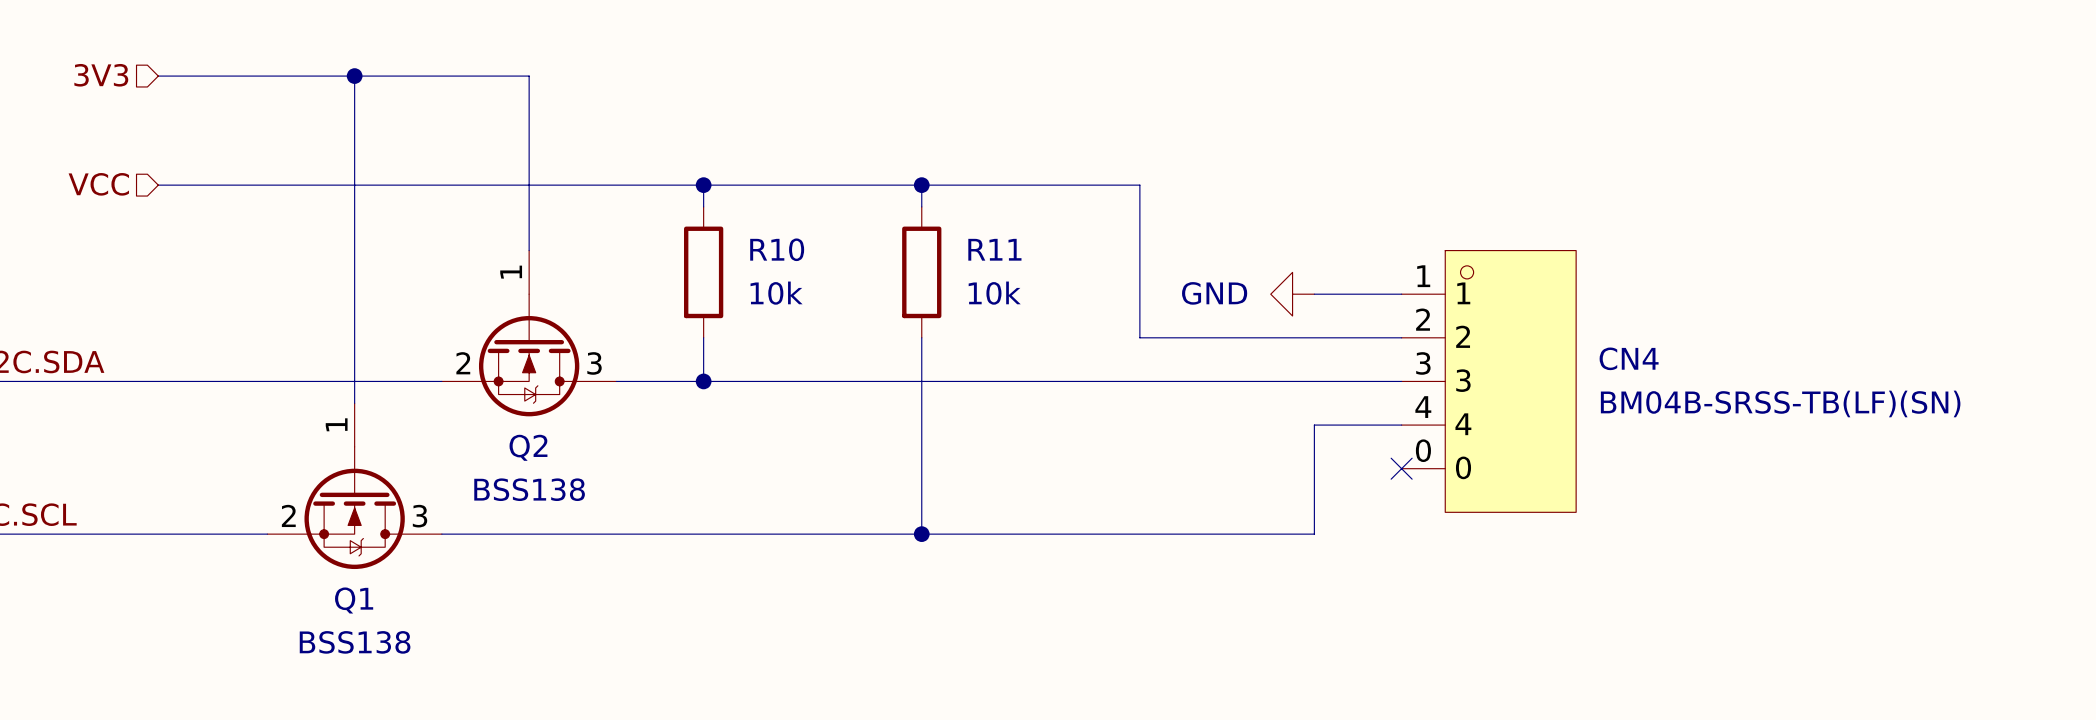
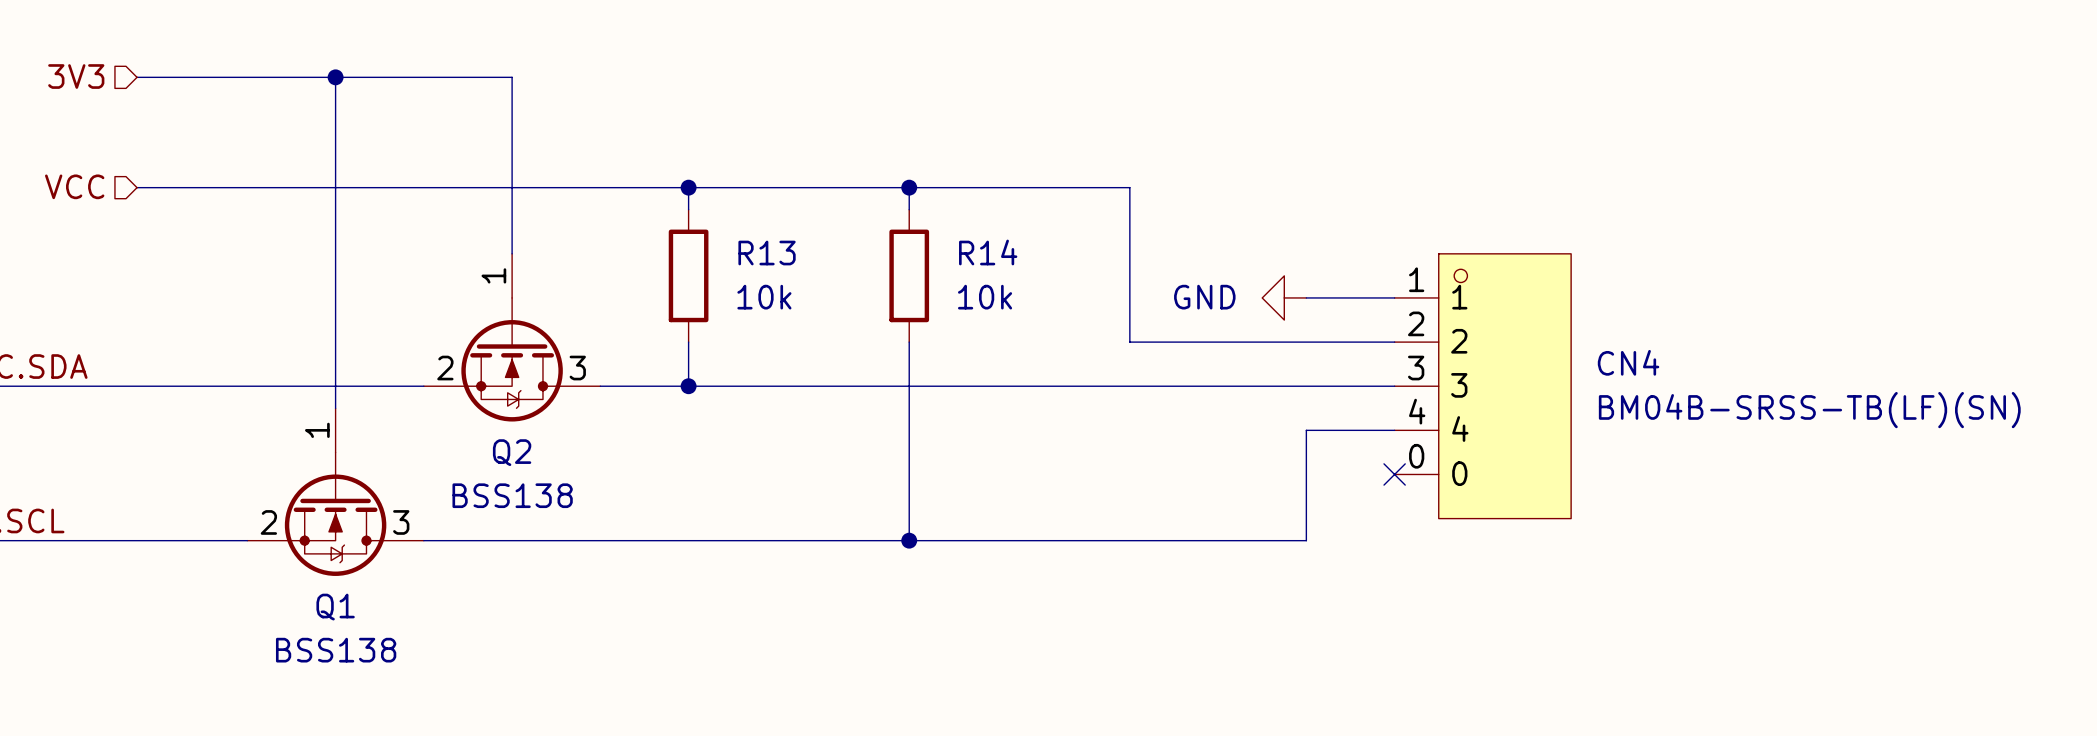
R10 name: R10 (777, 249) -> R13 (767, 253)
R11 name: R11 (994, 249) -> R14 (988, 252)

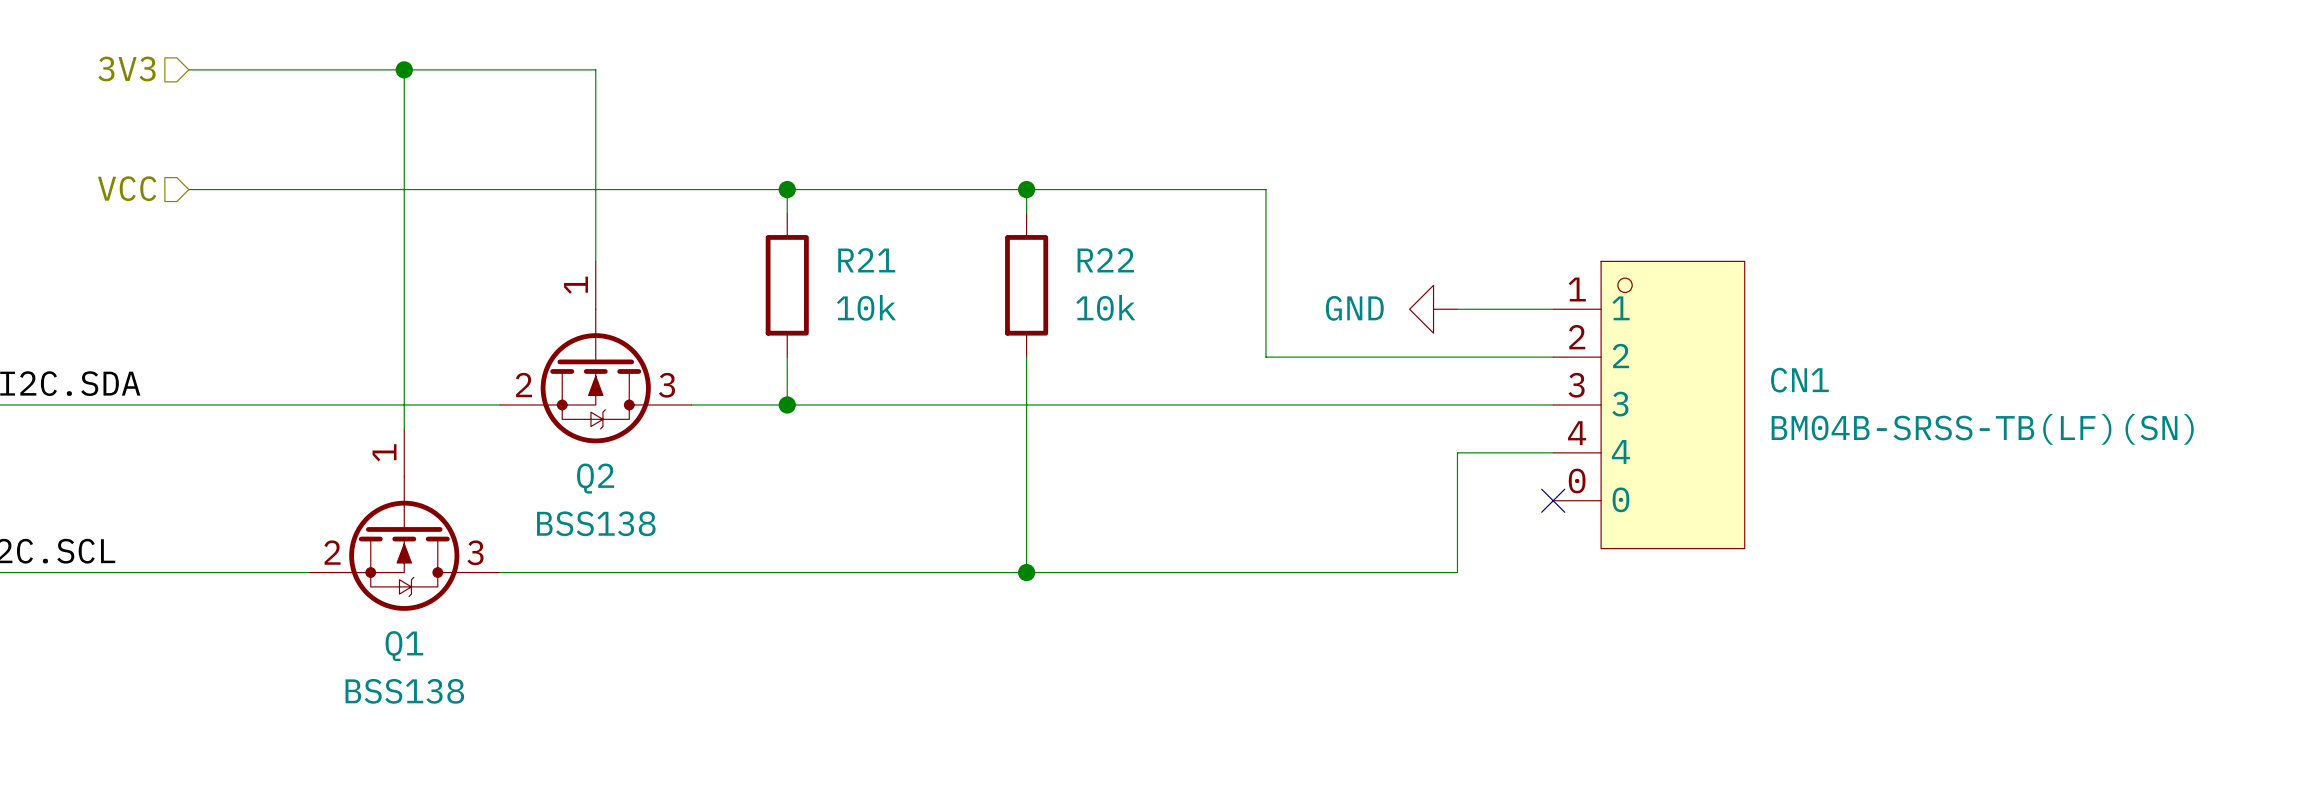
R14 name: R14 (988, 252) -> R22 (1105, 260)
R13 name: R13 (767, 253) -> R21 (866, 260)
CN4 name: CN4 (1628, 362) -> CN1 (1799, 380)

